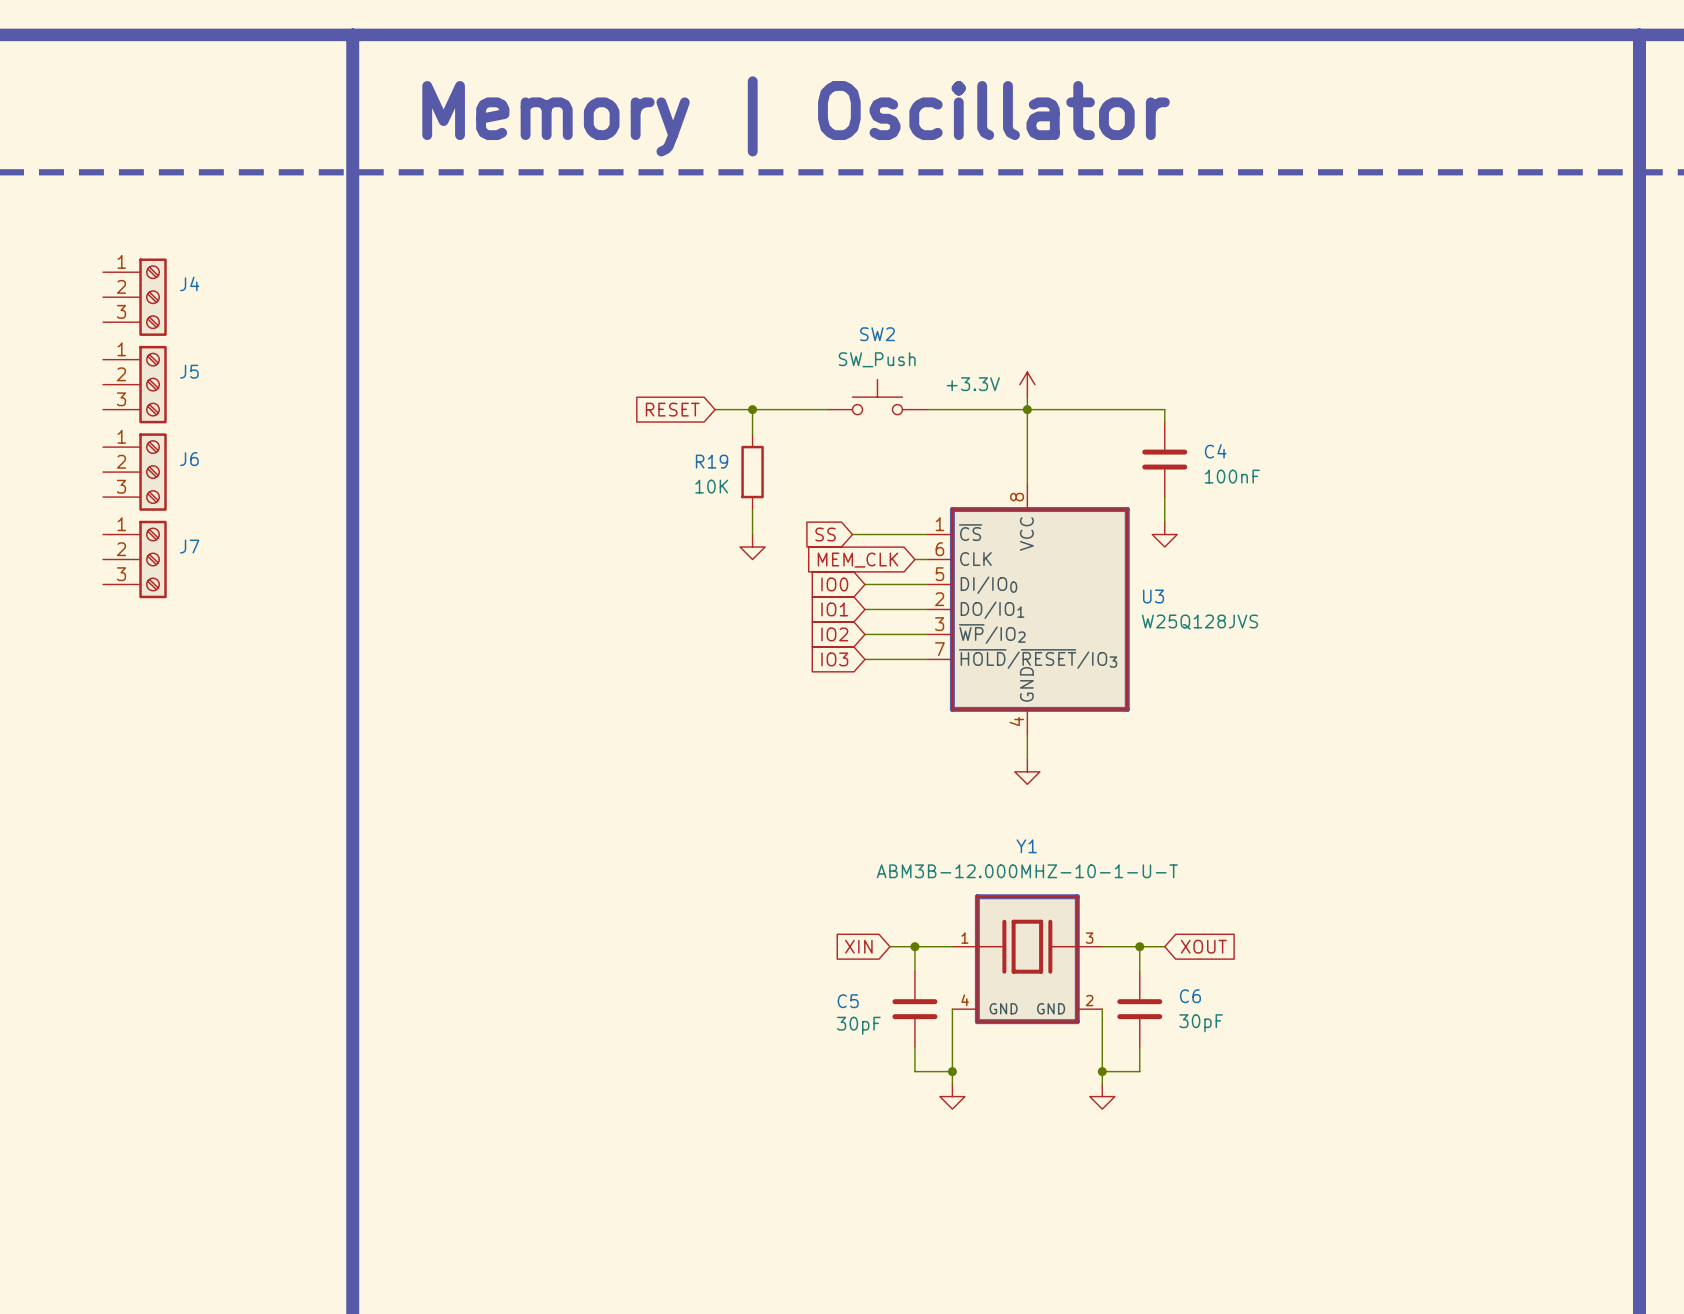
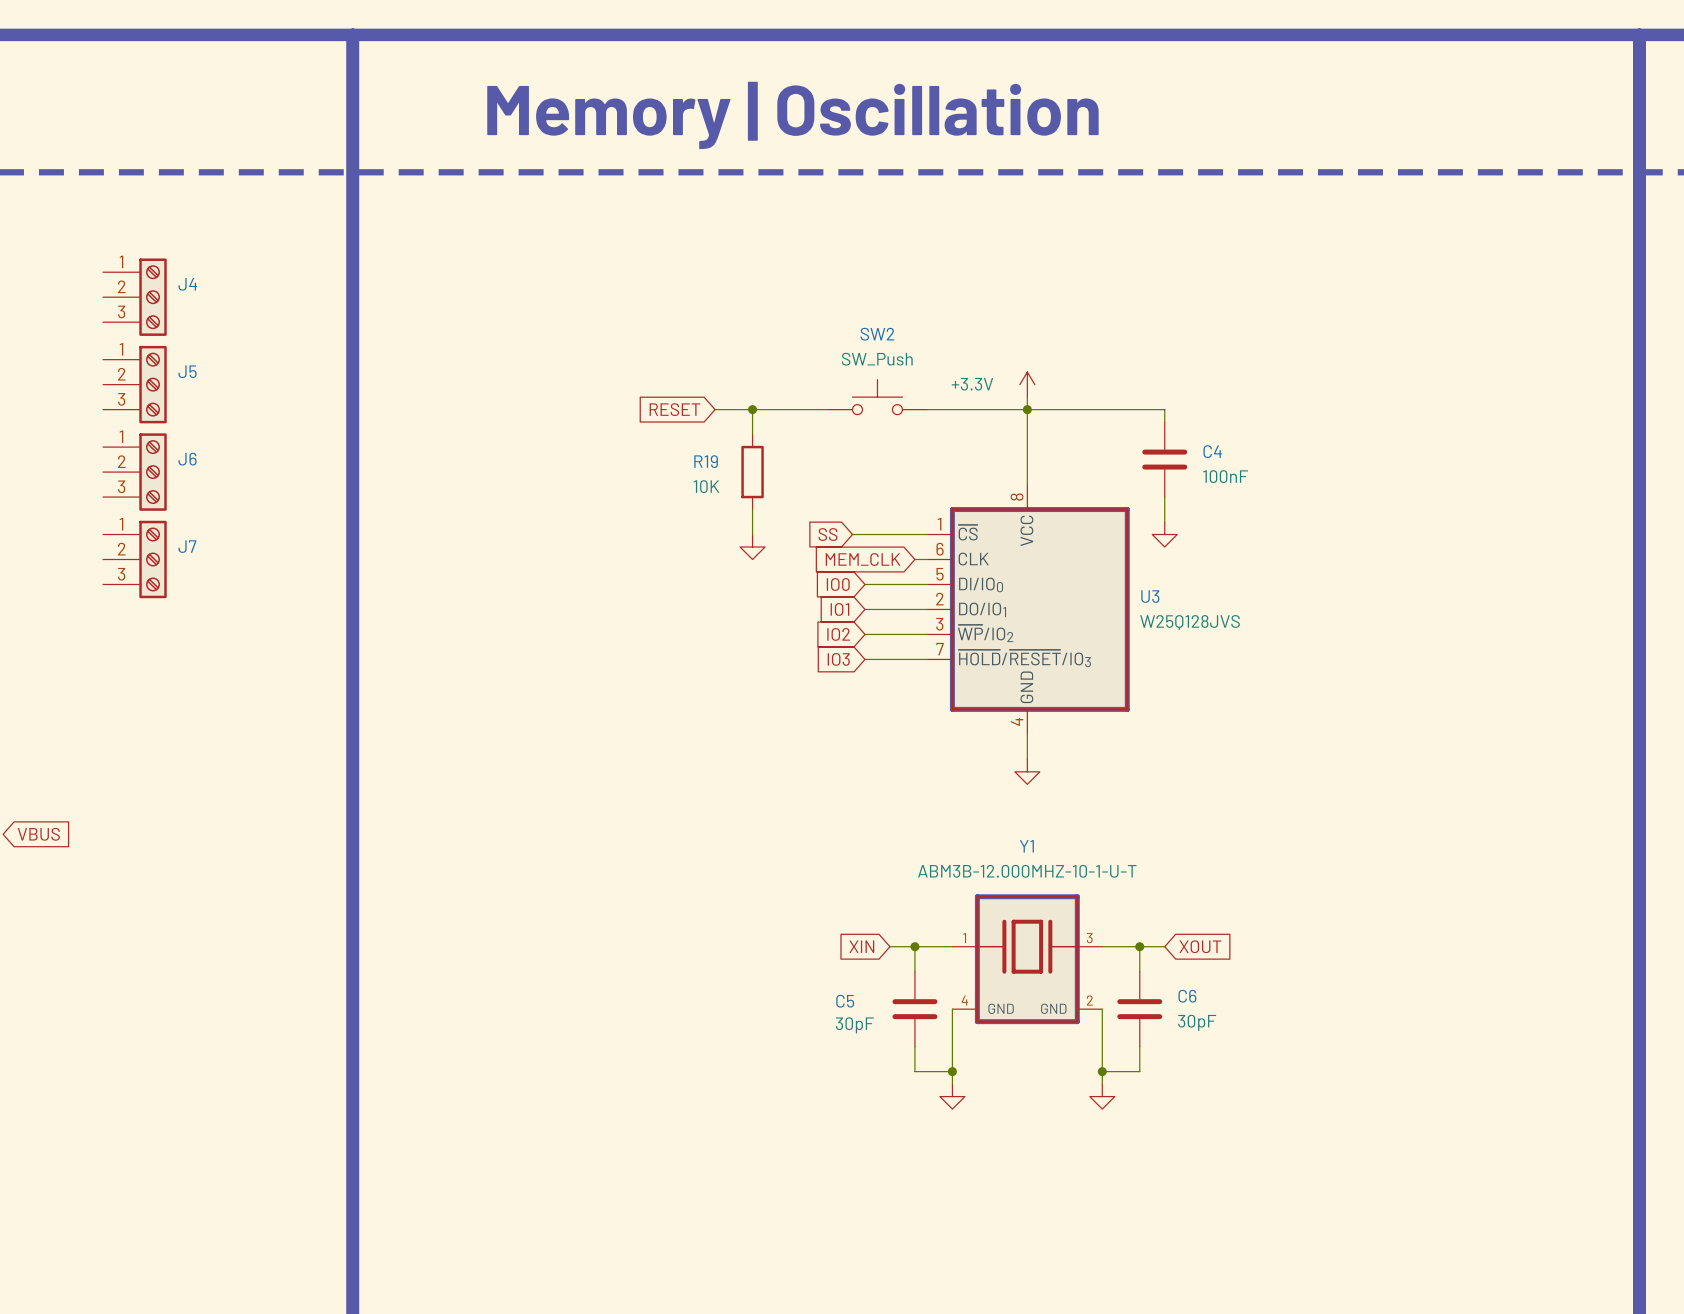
text: Memory | Oscillator (796, 116) -> Memory | Oscillation (792, 115)
global label: none -> VBUS (38, 834)

